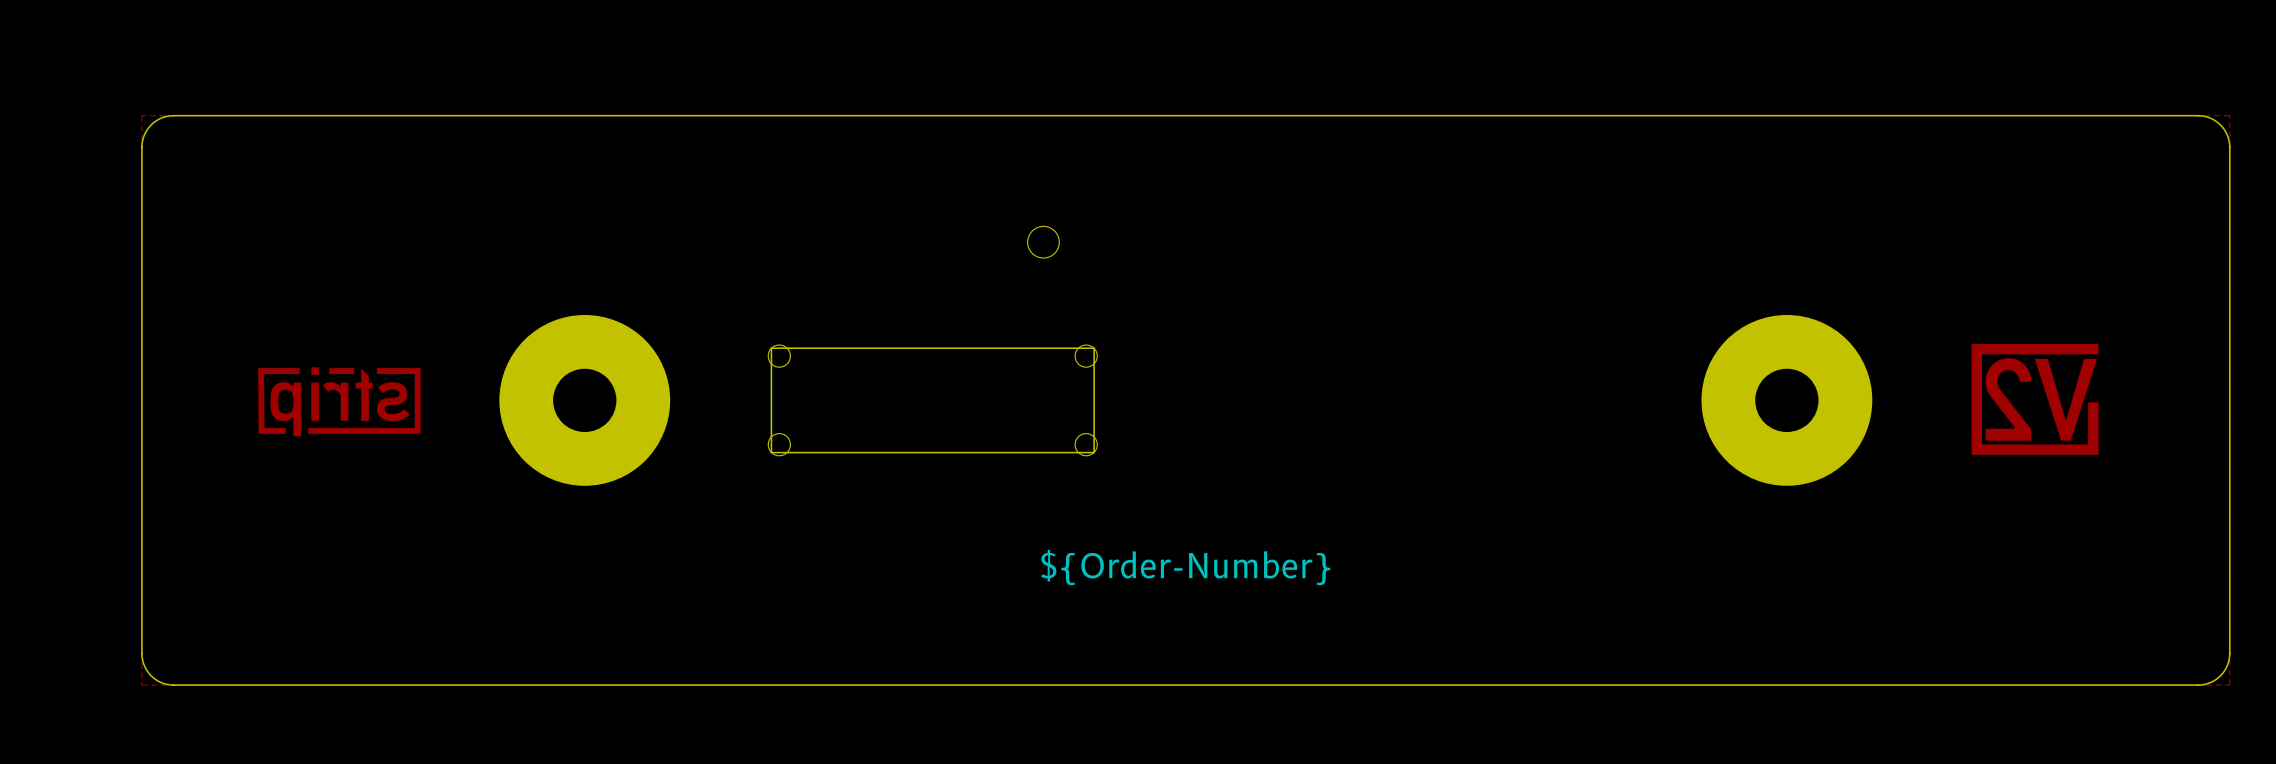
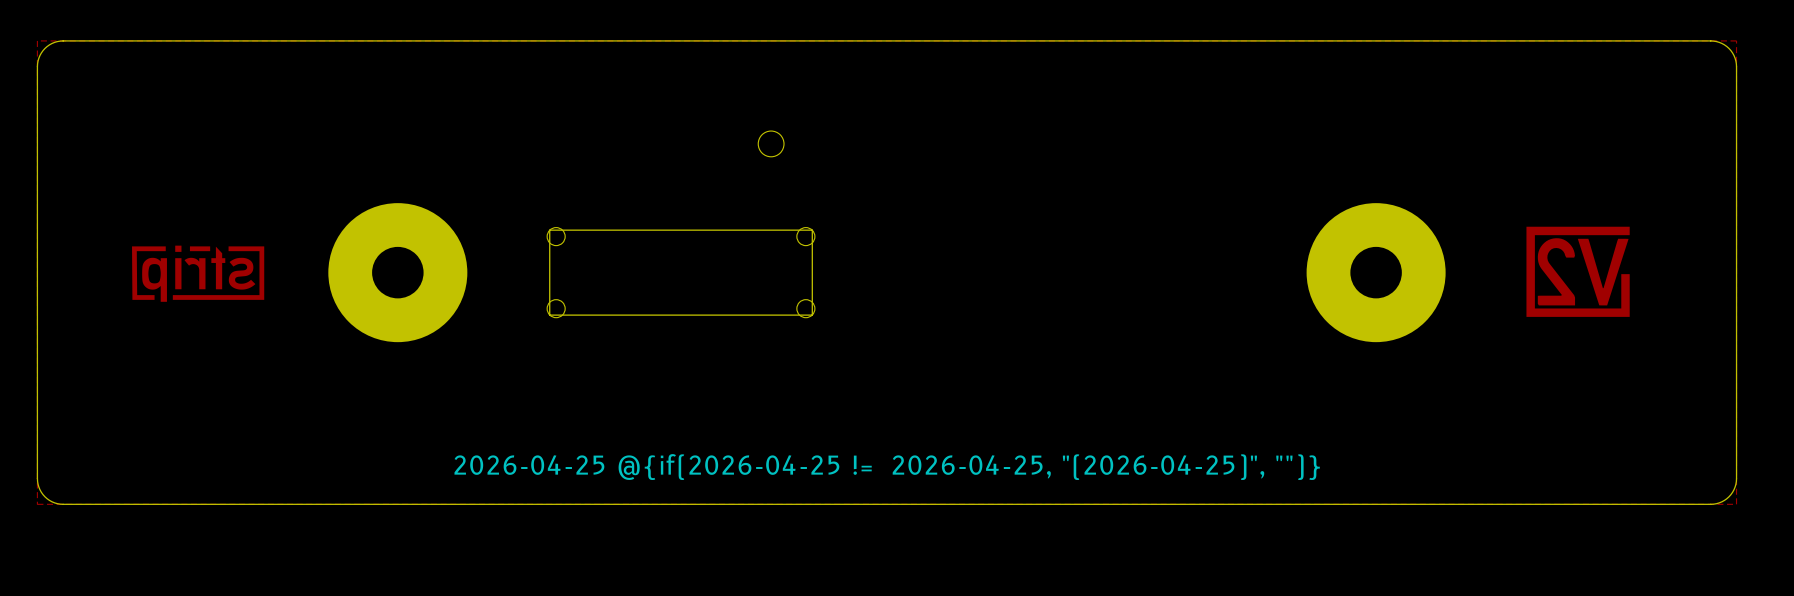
drawing: [1041, 549, 1331, 586] -> none
drawing: none -> [454, 454, 1320, 480]

